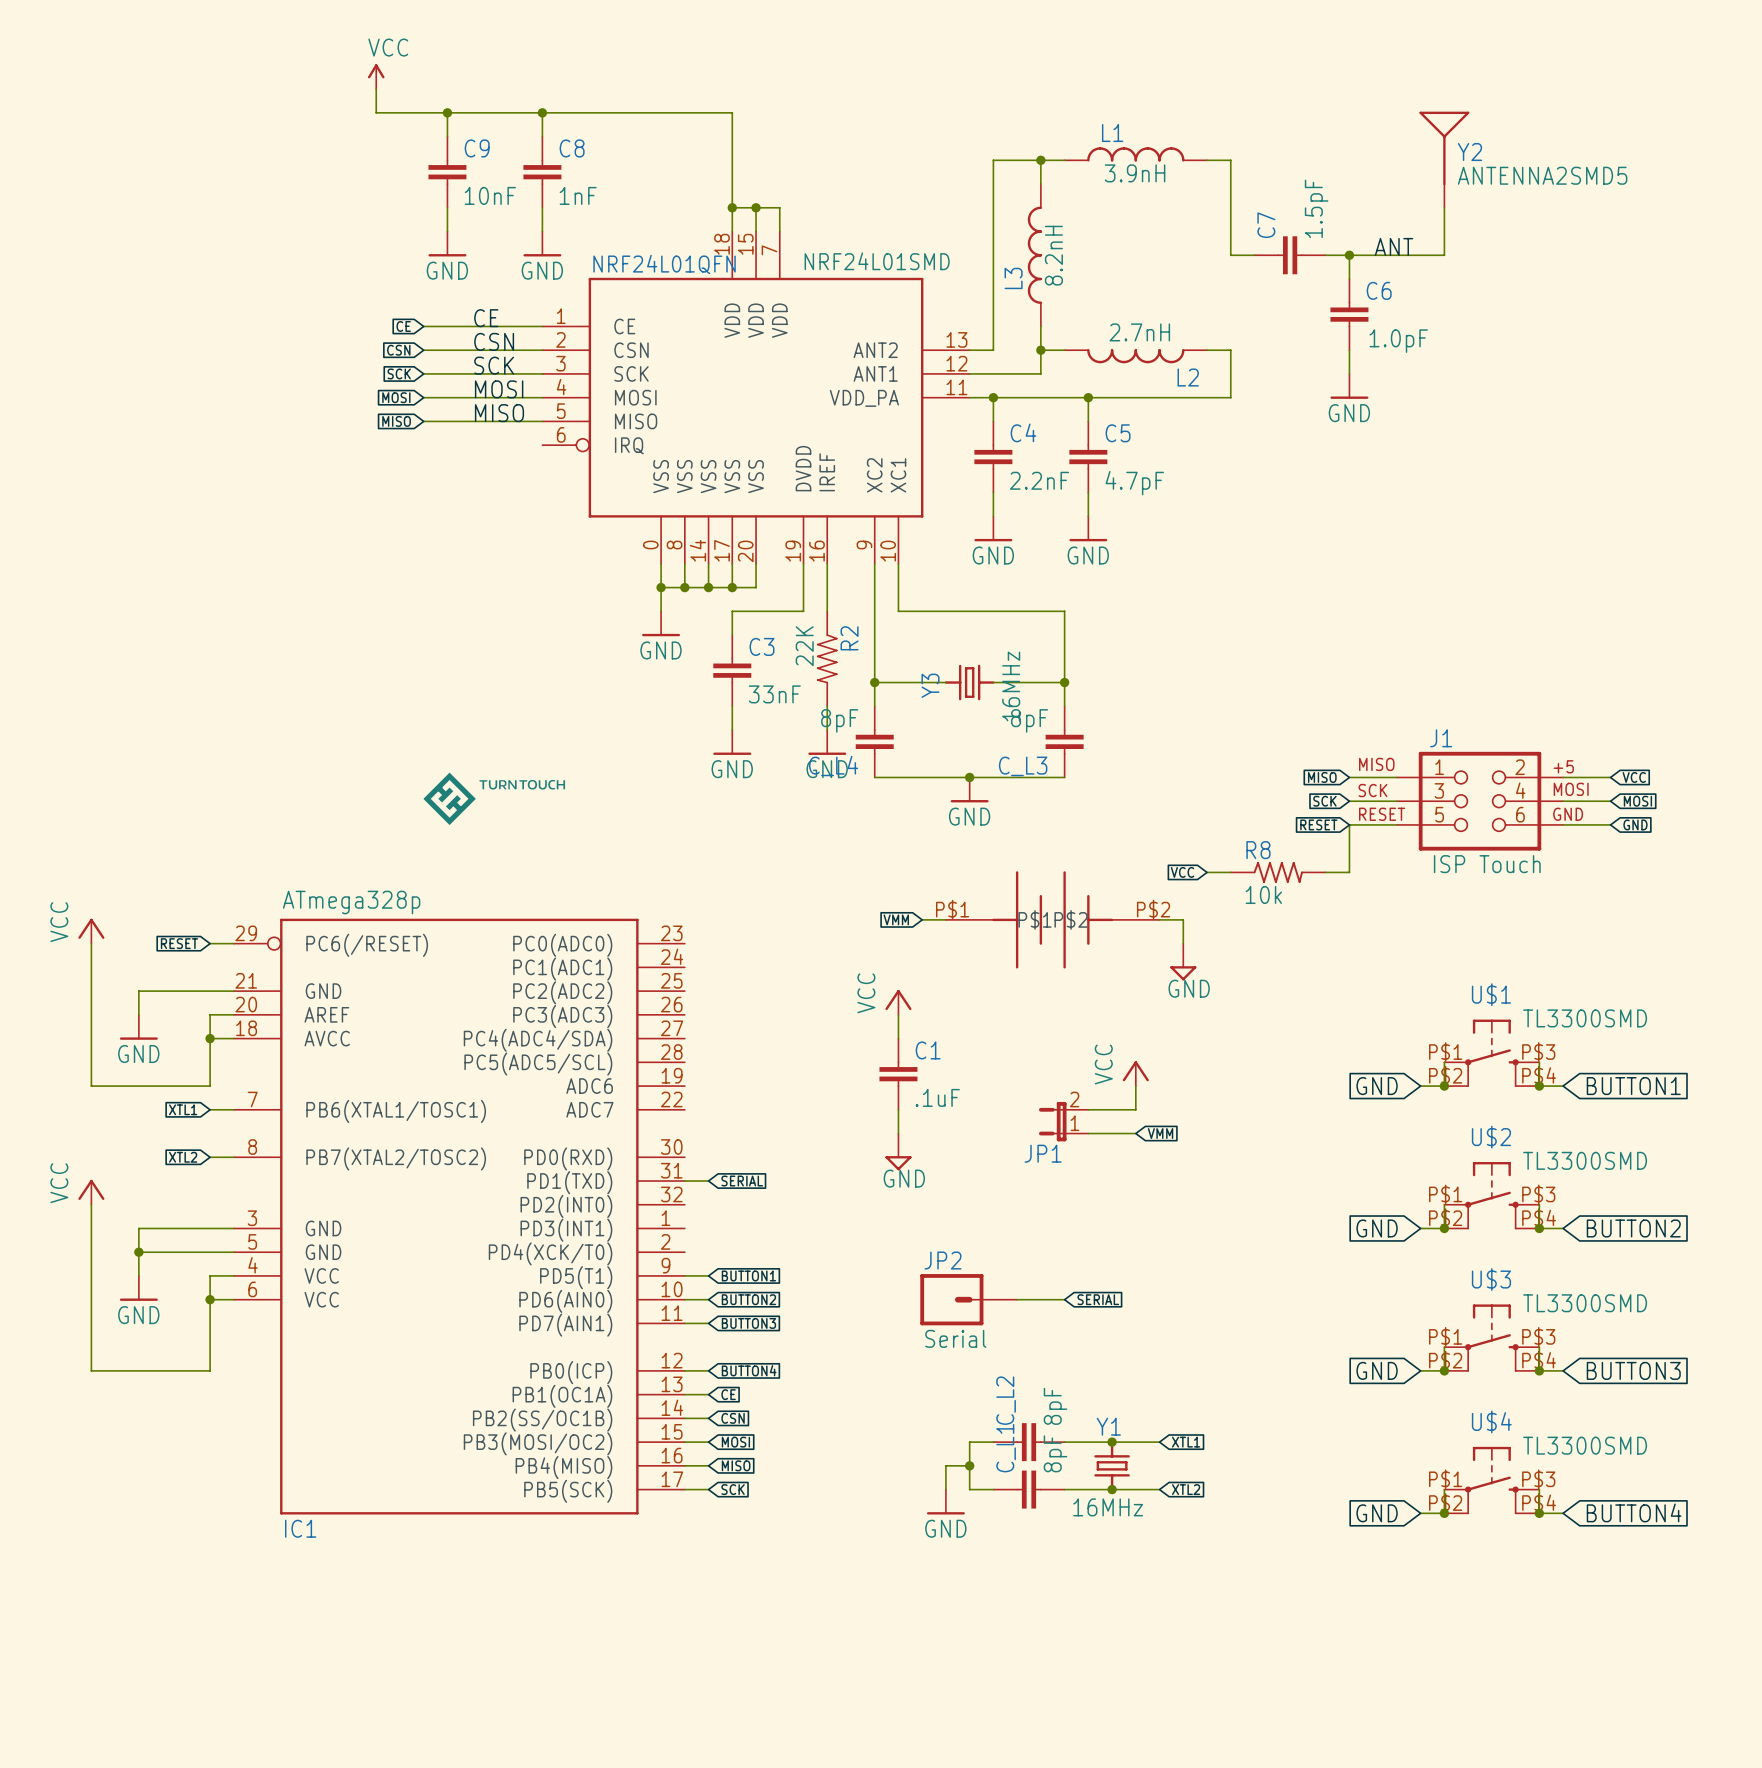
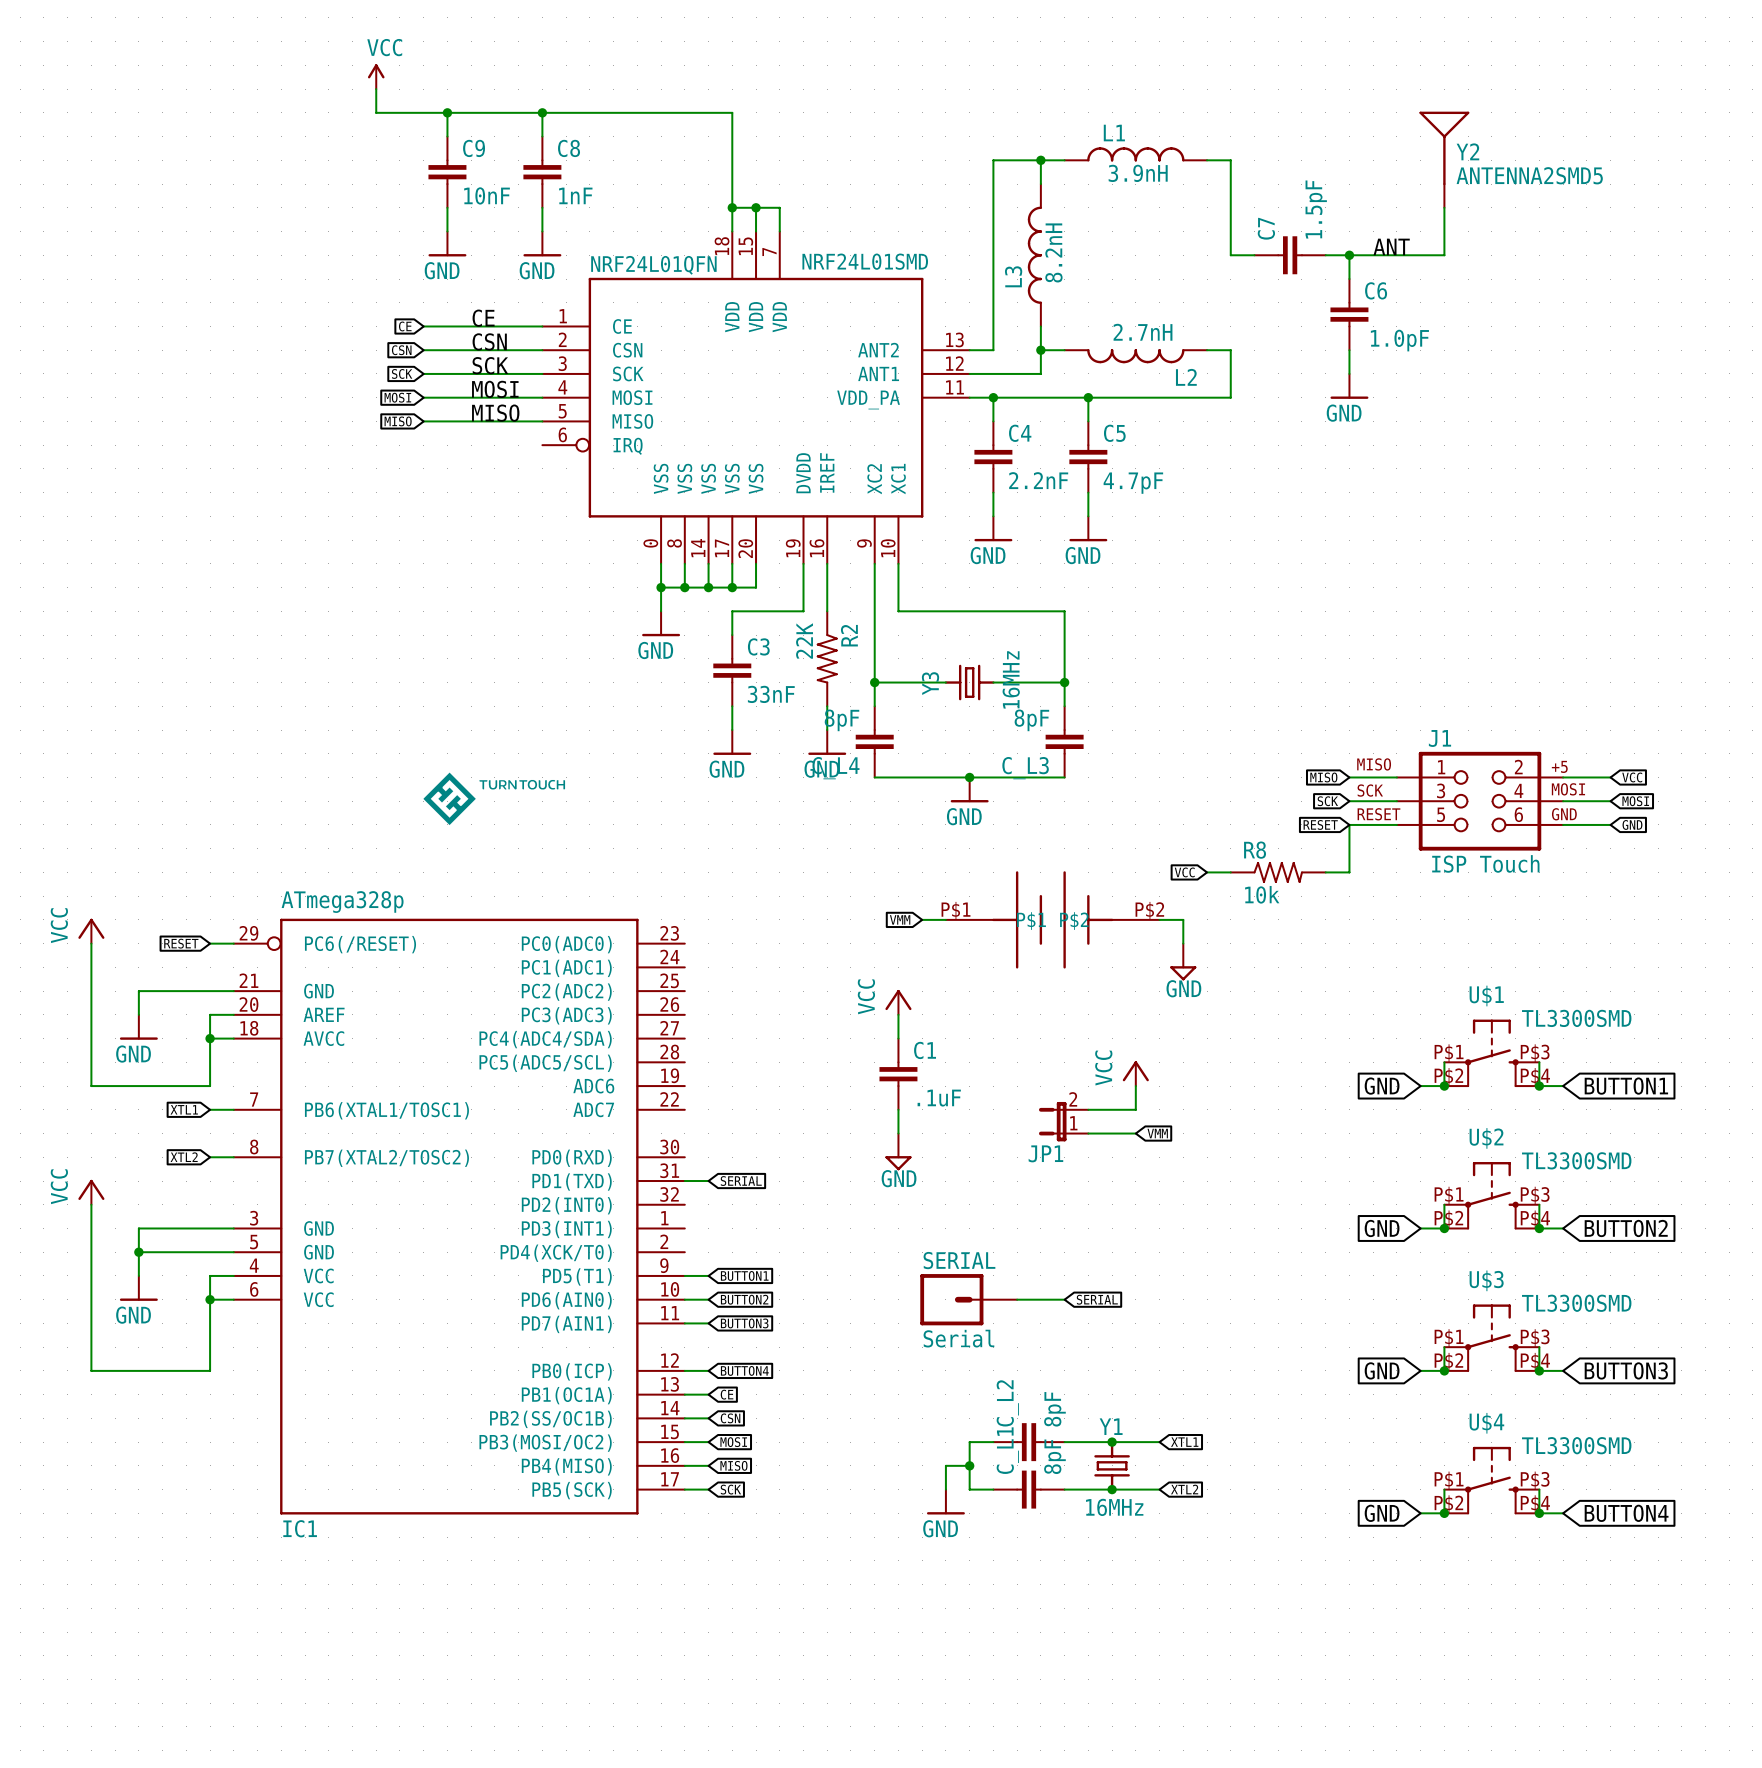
JP2 name: JP2 (943, 1260) -> SERIAL (959, 1260)

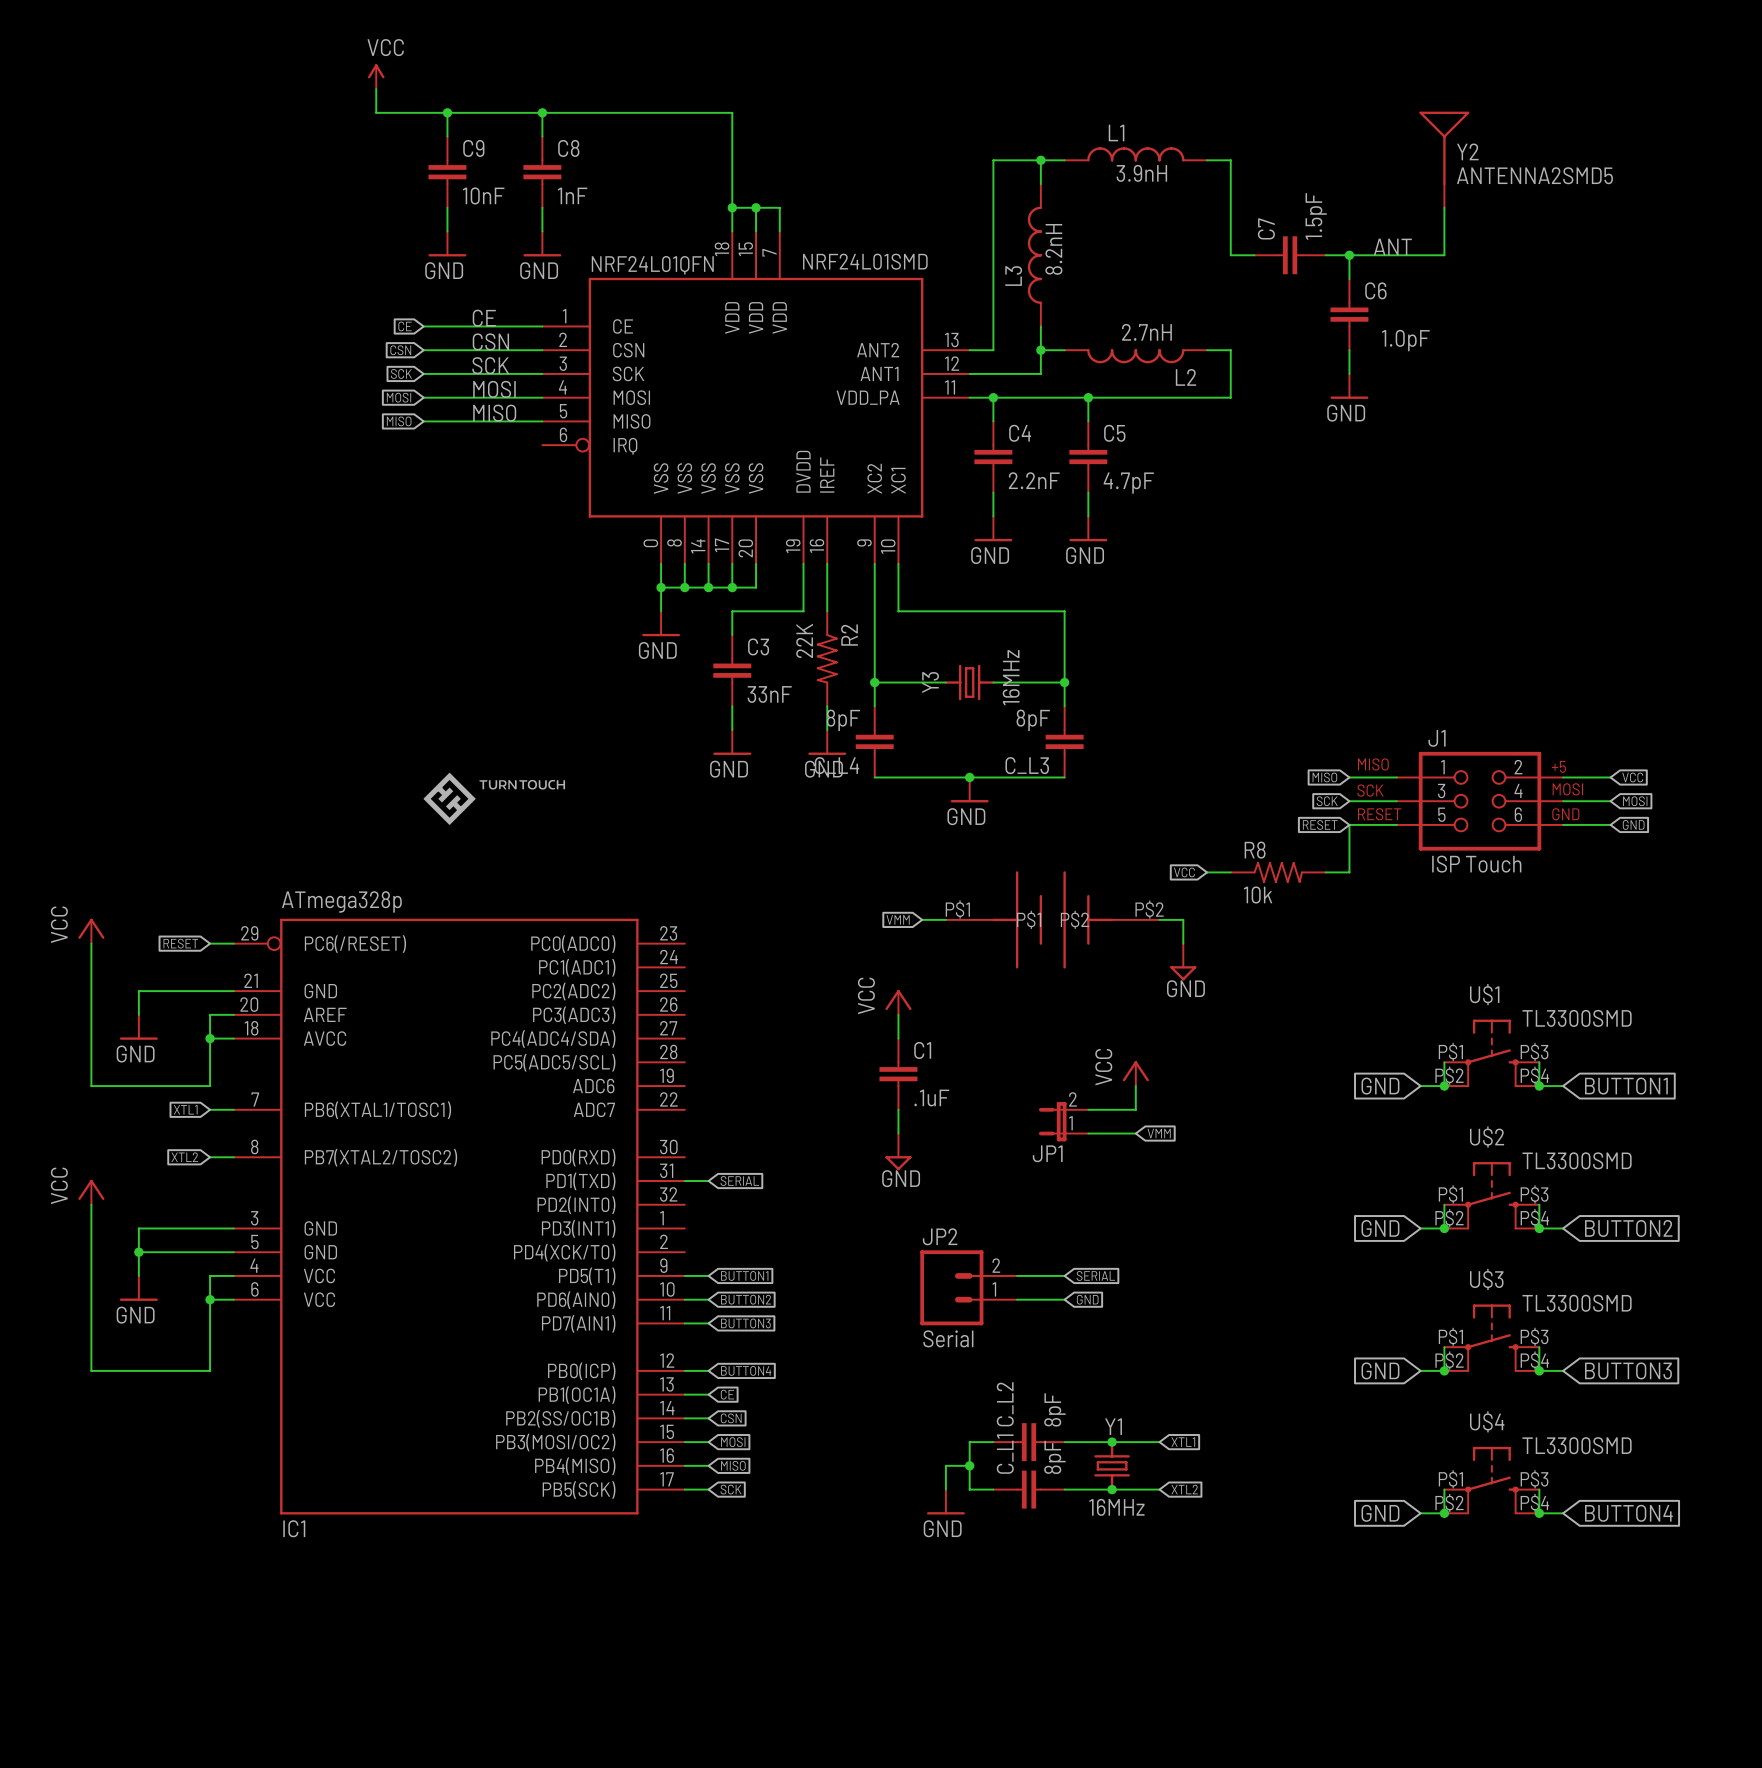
wire: none -> (1017, 1275) (1064, 1275)
global label: none -> SERIAL (1095, 1275)
JP2: none -> Serial (968, 1287)
SERIAL: Serial (968, 1299) -> none
global label: SERIAL (1097, 1299) -> GND (1087, 1299)

